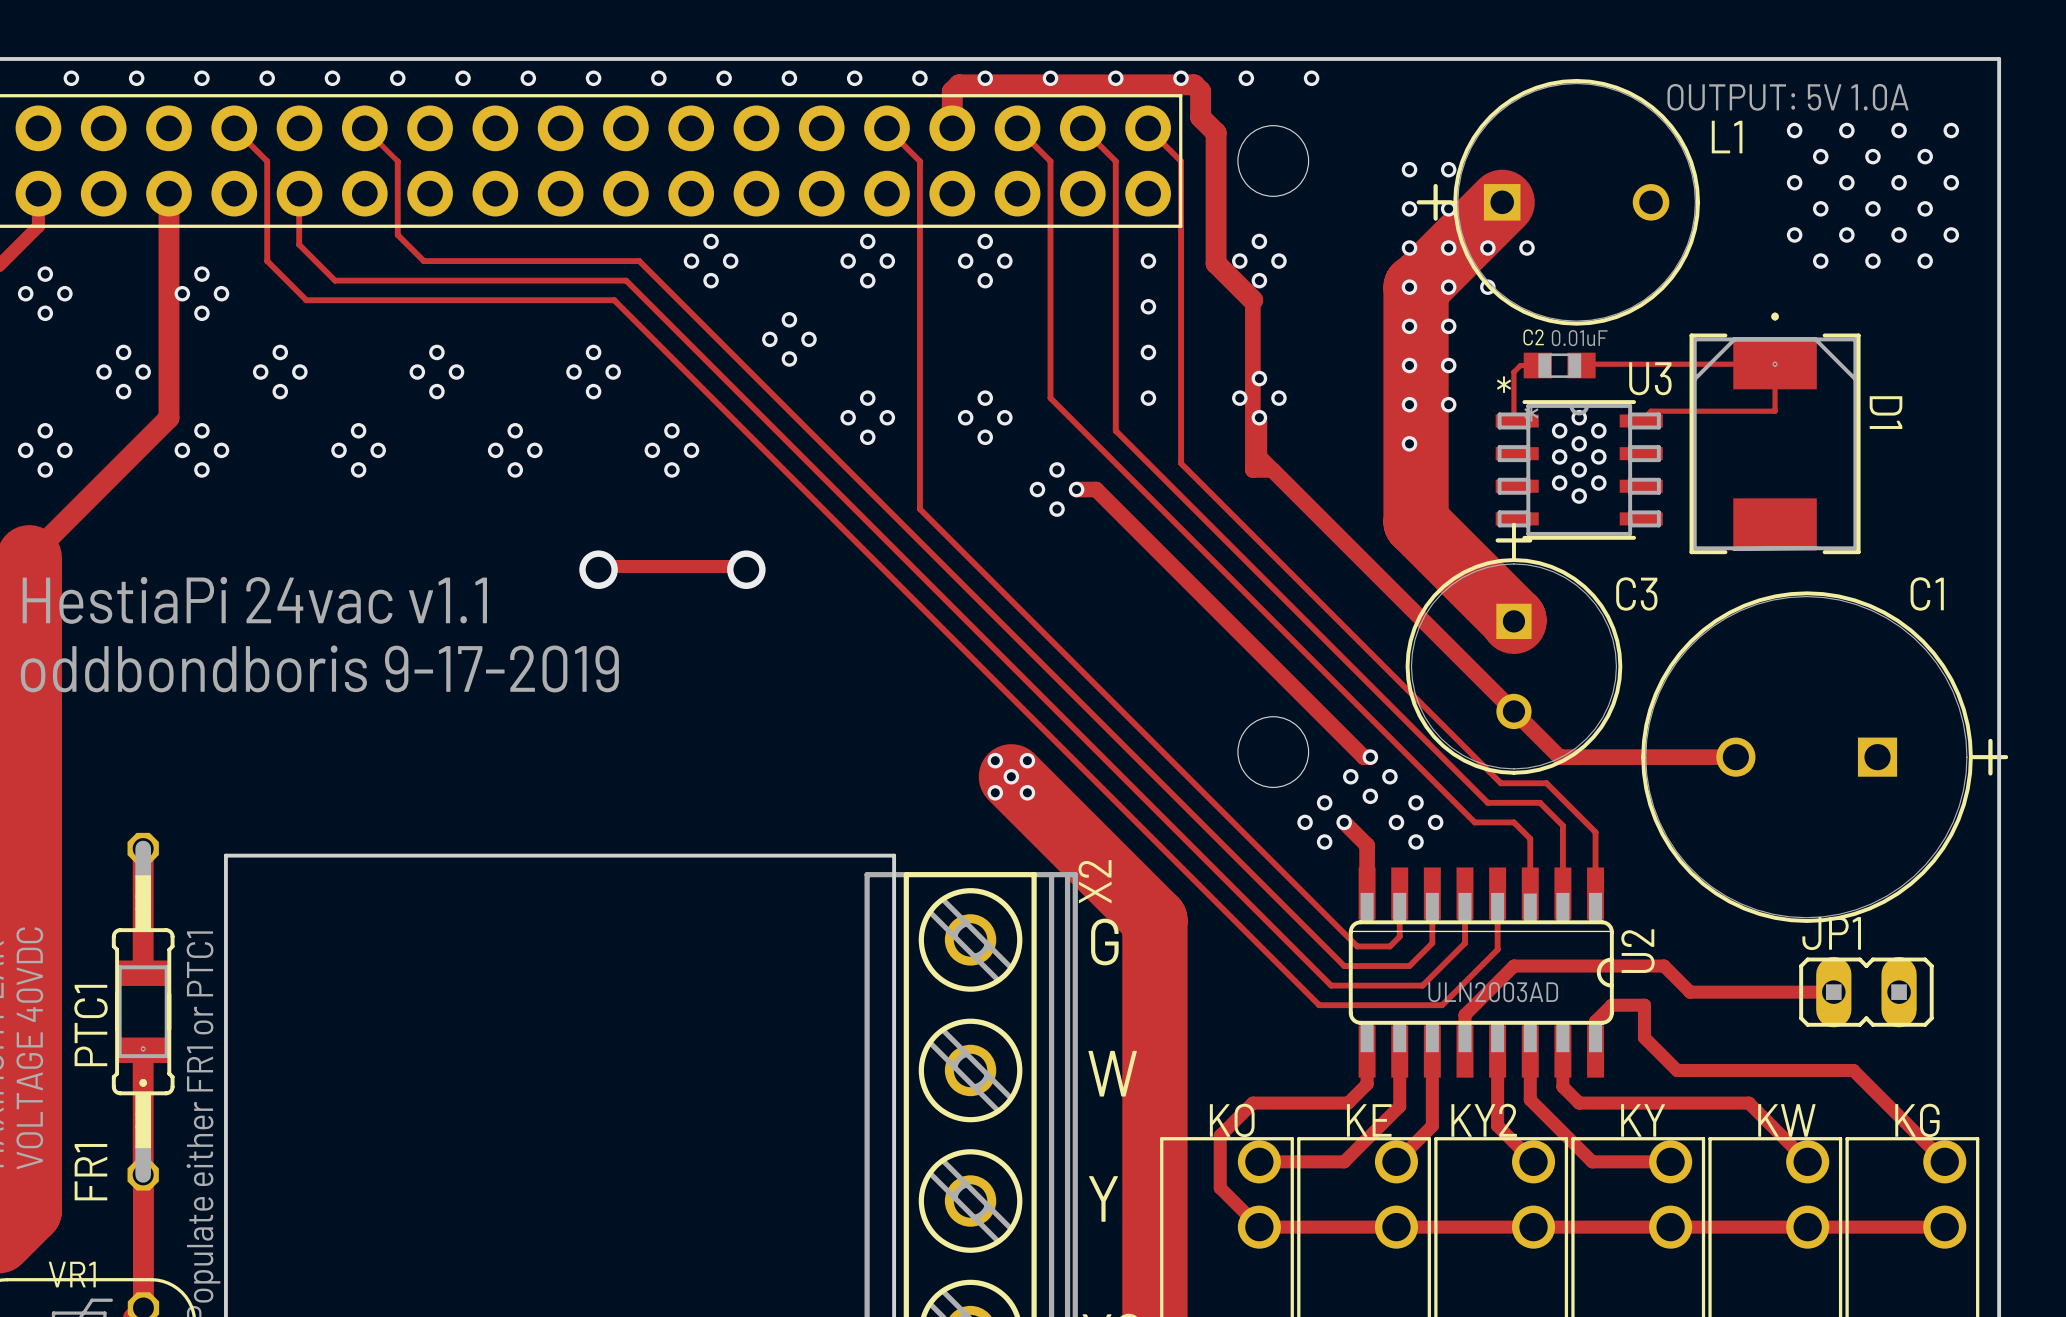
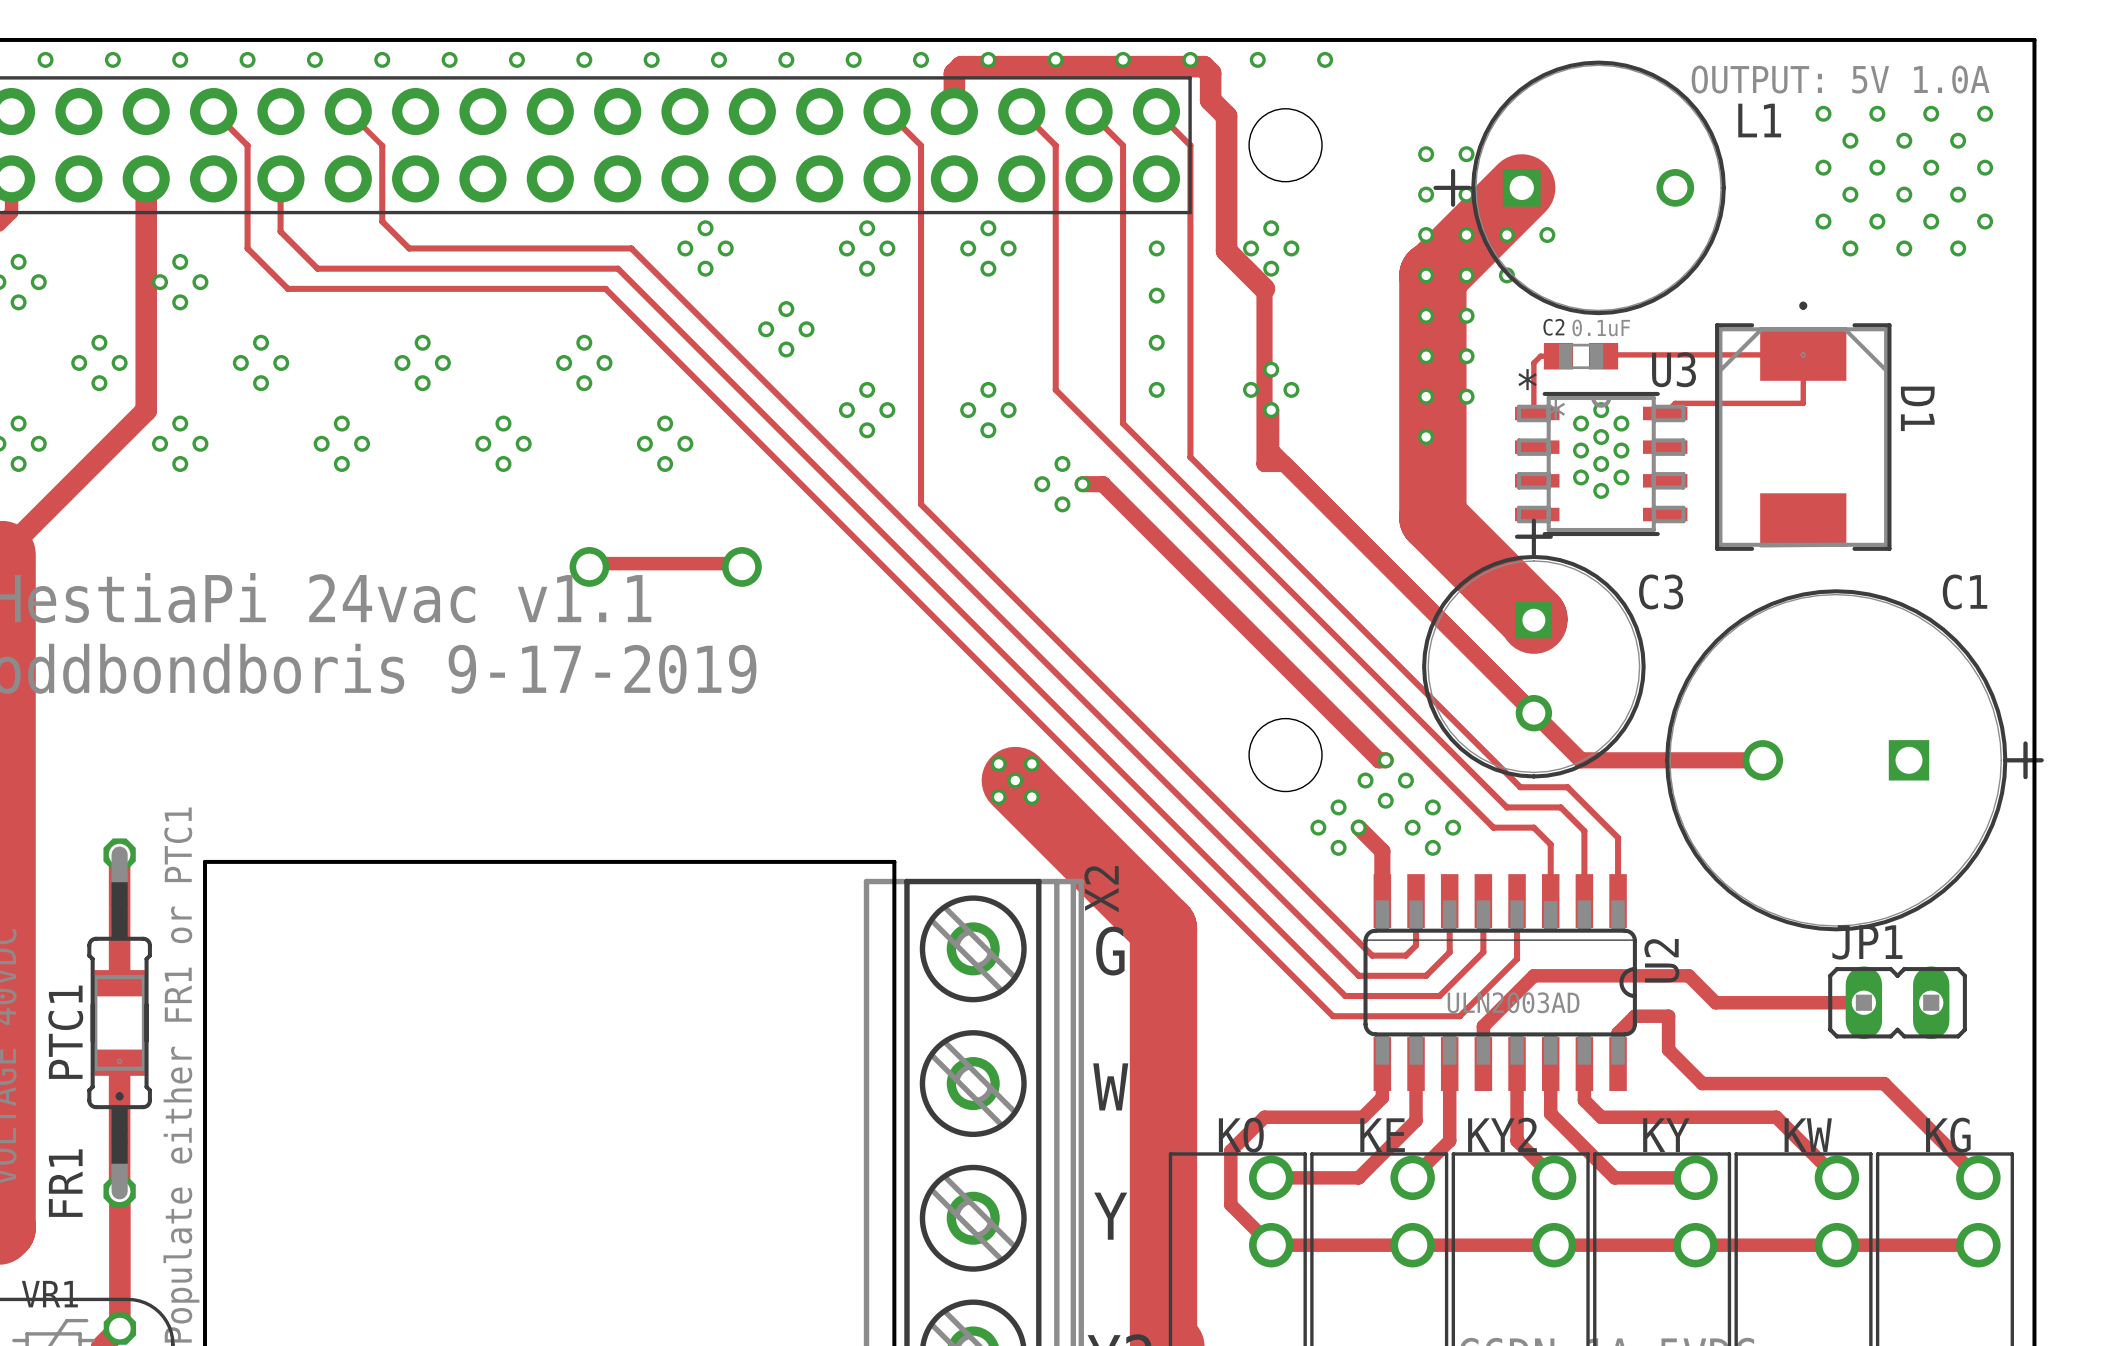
C2 value: 0.01uF (1579, 338) -> 0.1uF (1601, 327)

